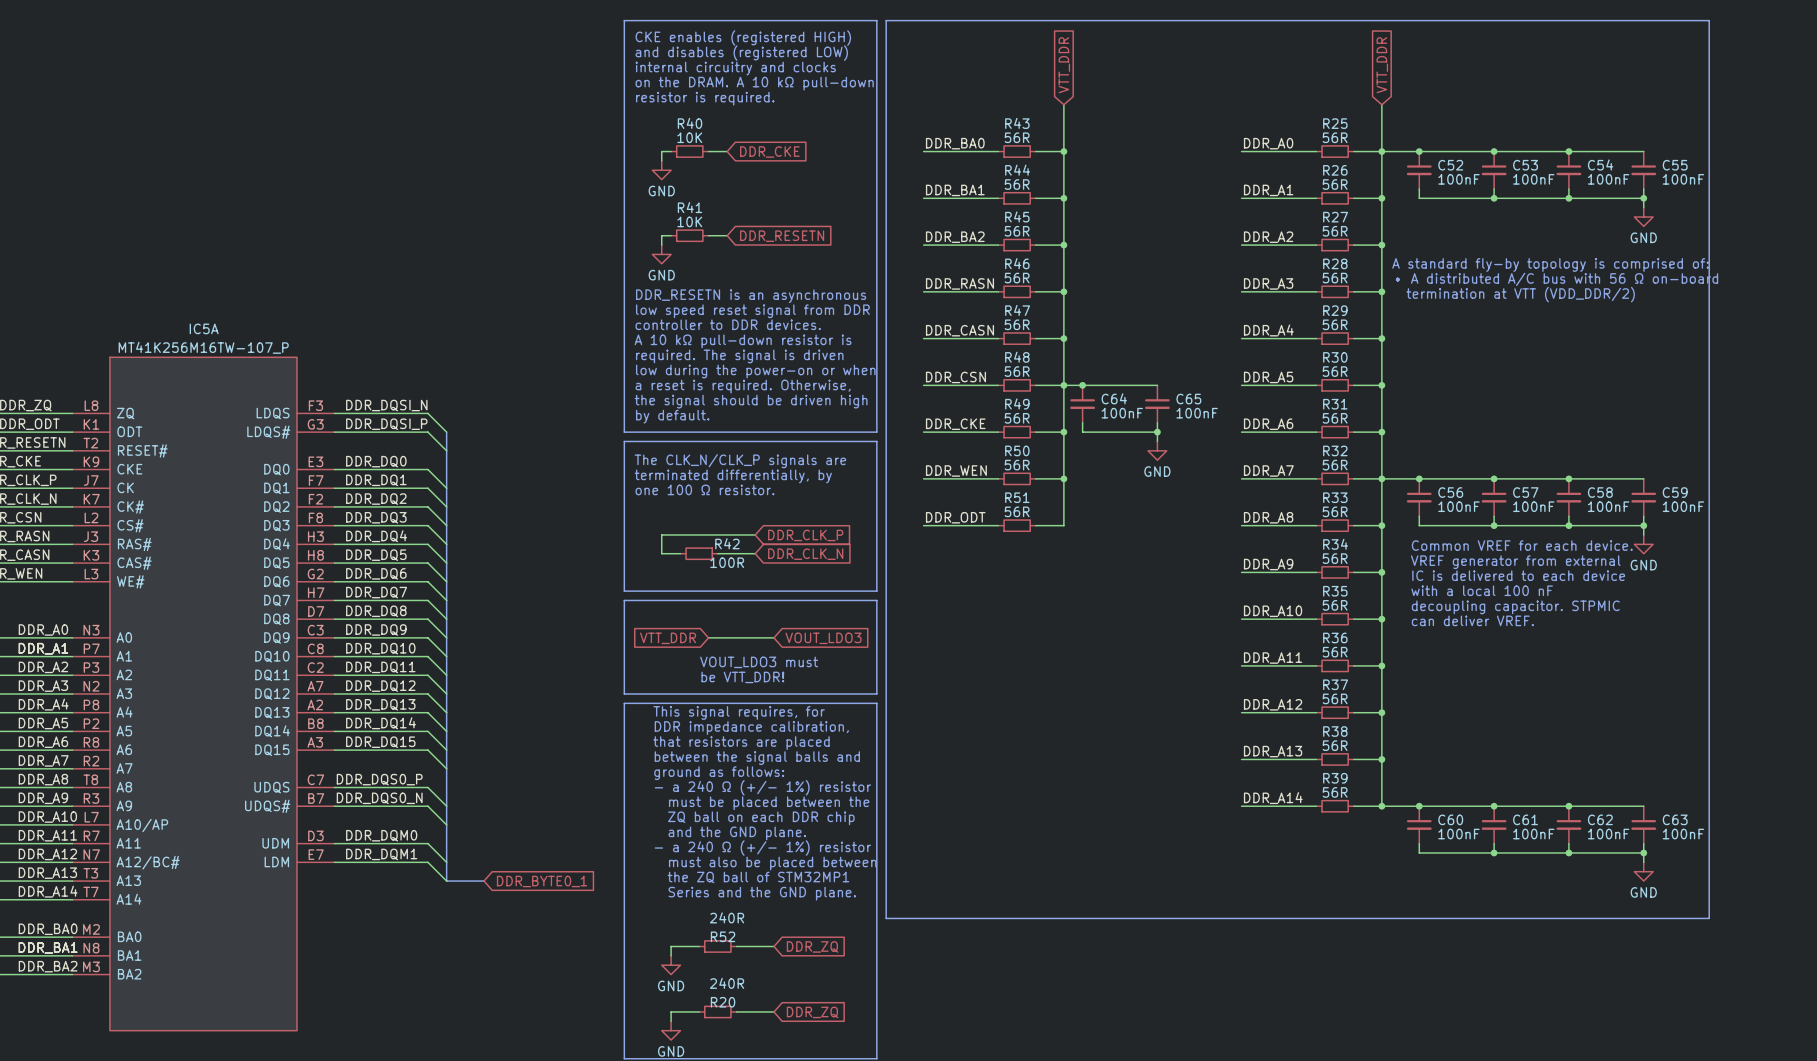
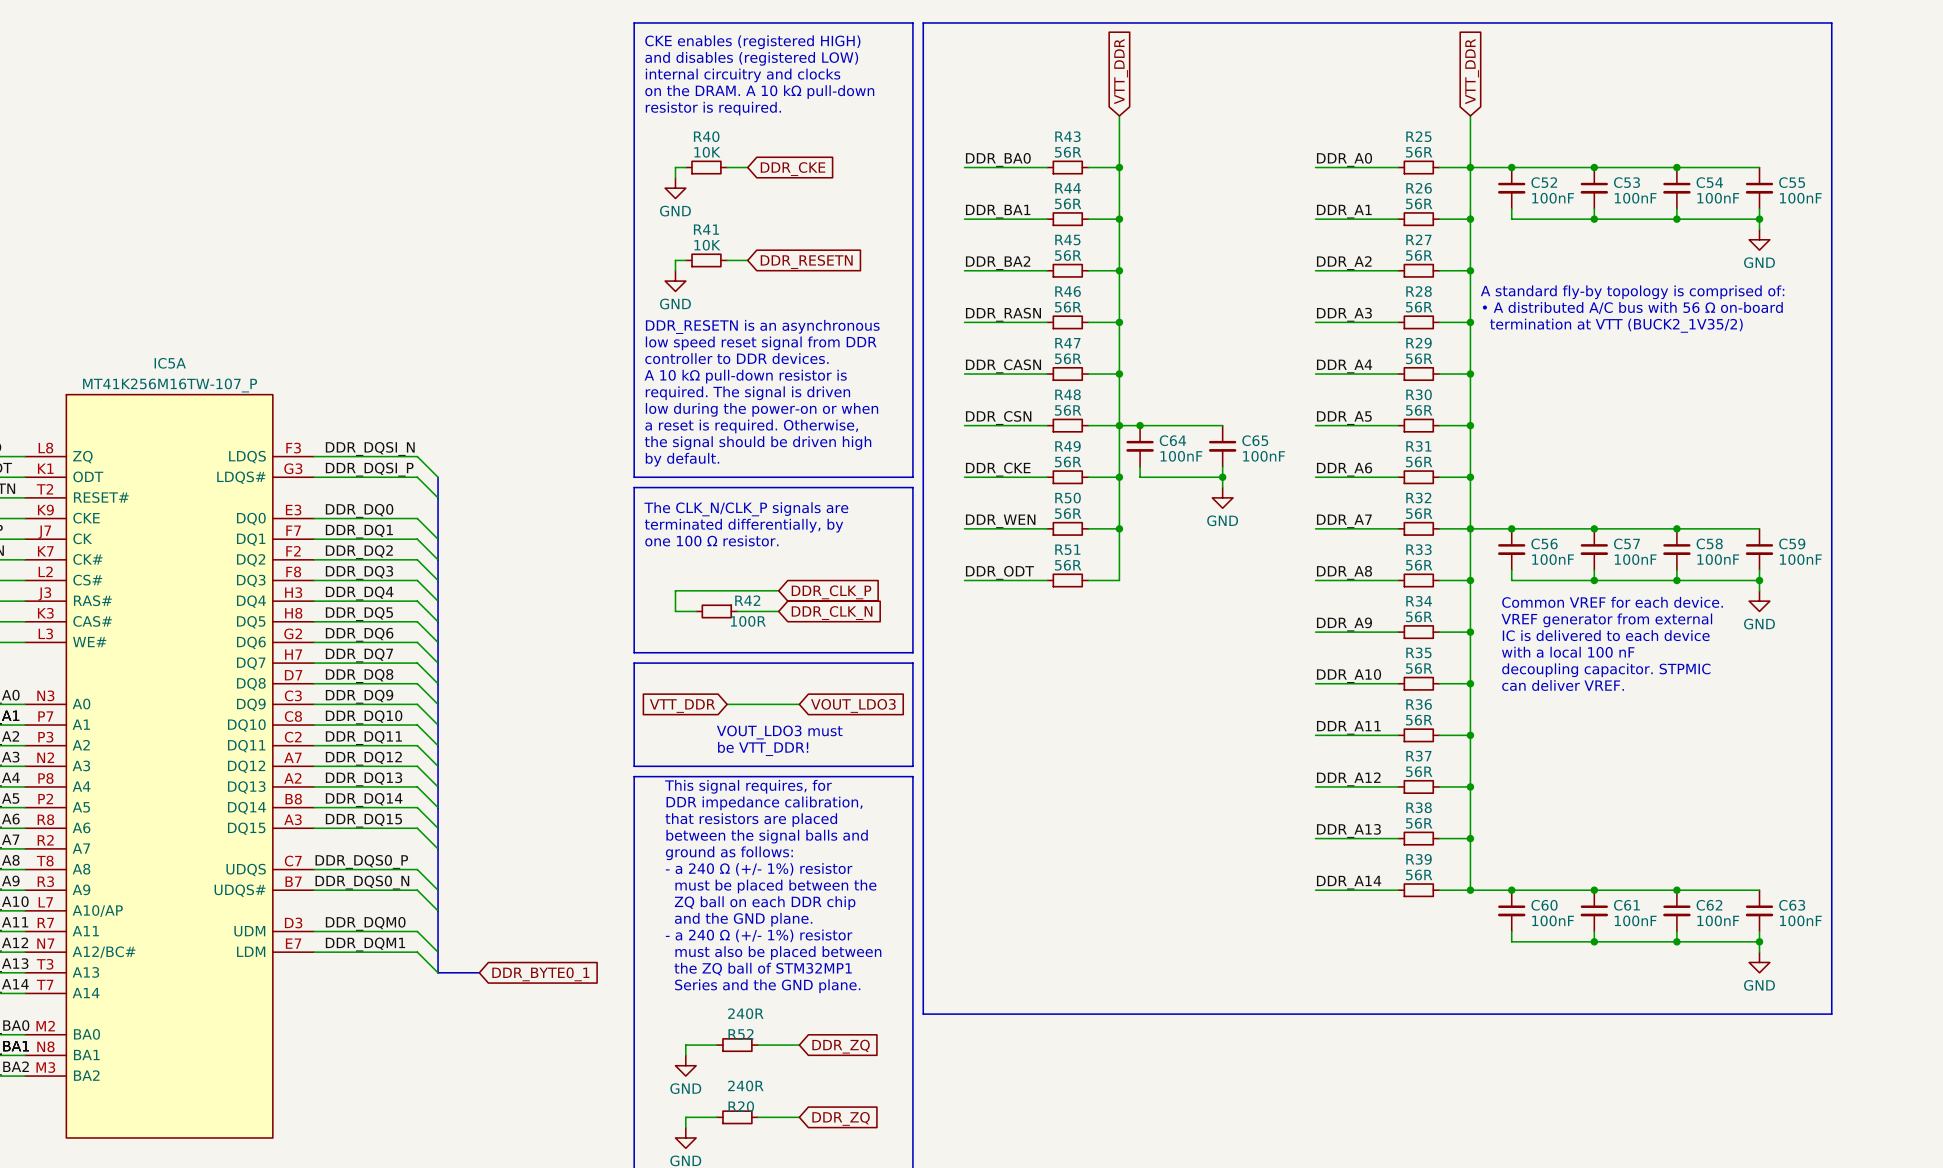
text: termination at VTT (VDD_DDR/2) (1520, 294) -> termination at VTT (BUCK2_1V35/2) (1616, 325)

